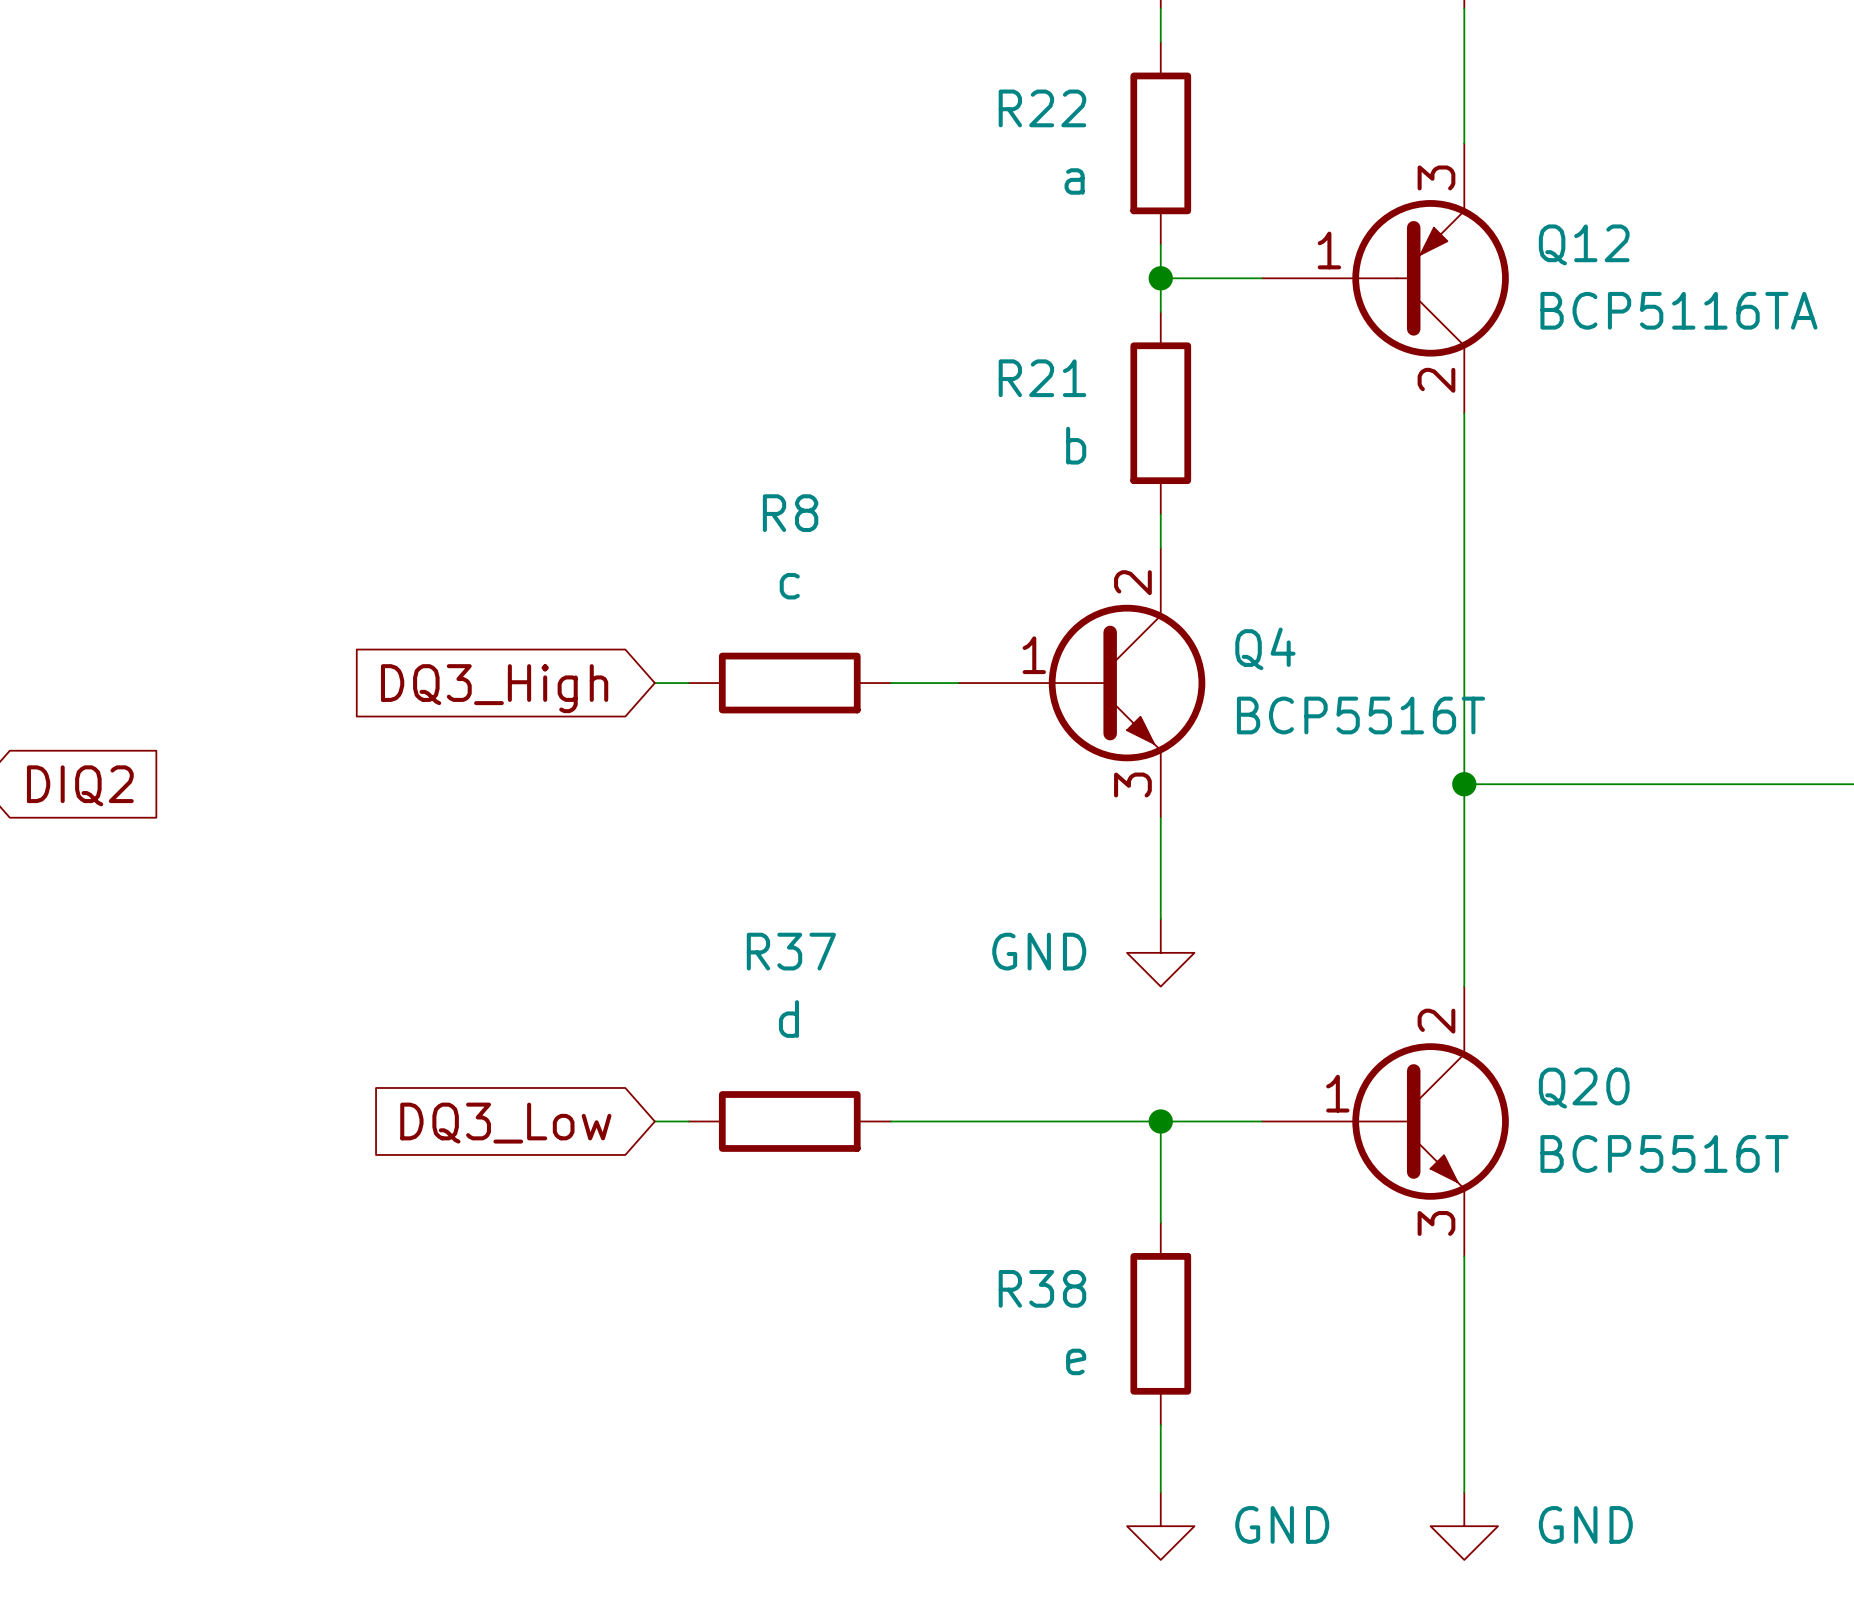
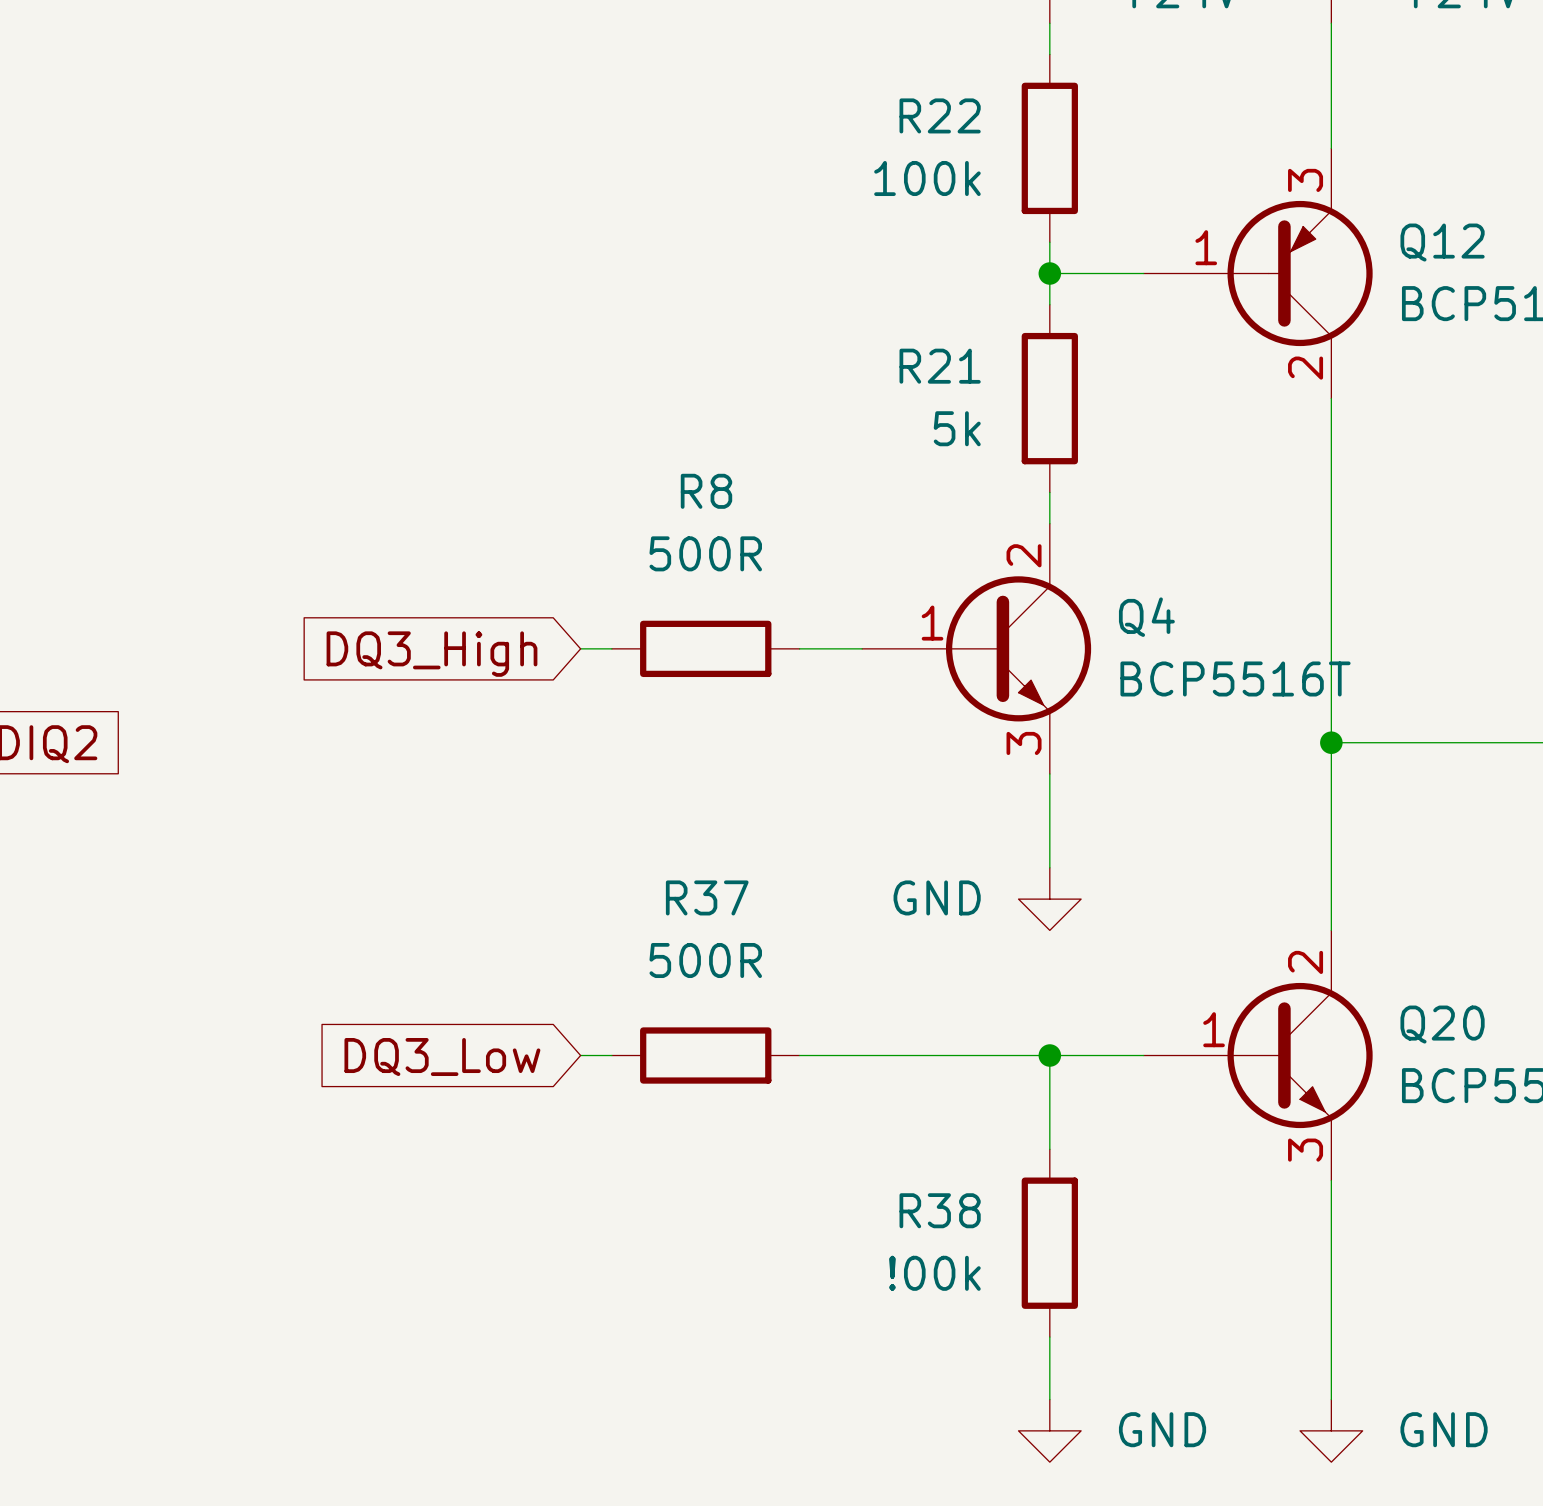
R22 value: a (1074, 181) -> 100k (927, 178)
R21 value: b (1076, 445) -> 5k (957, 428)
R8 value: c (789, 586) -> 500R (705, 553)
R37 value: d (788, 1019) -> 500R (705, 960)
R38 value: e (1076, 1361) -> !00k (934, 1273)

